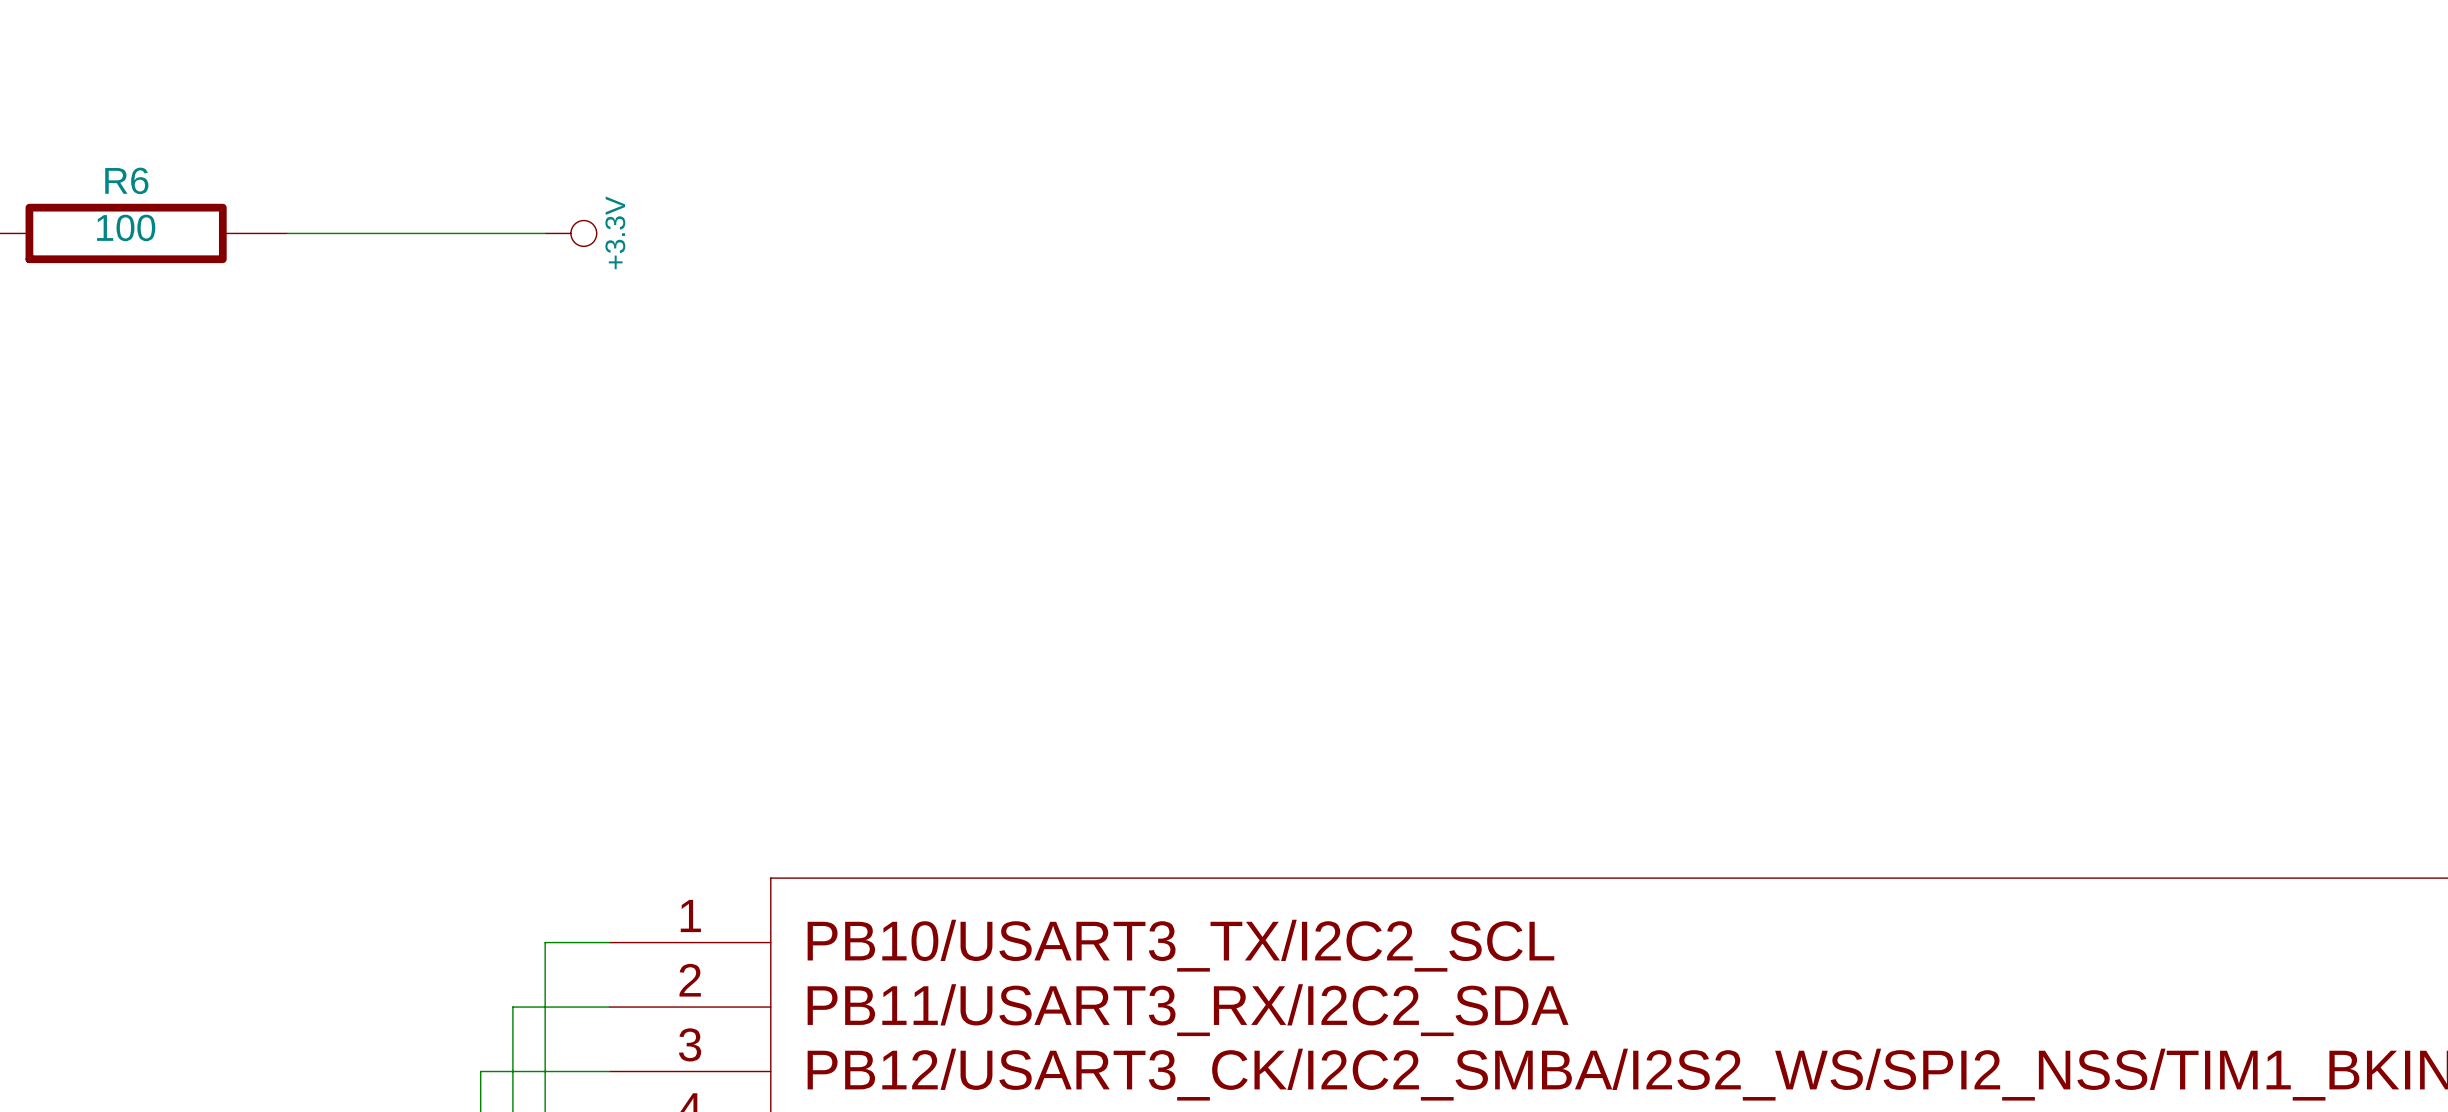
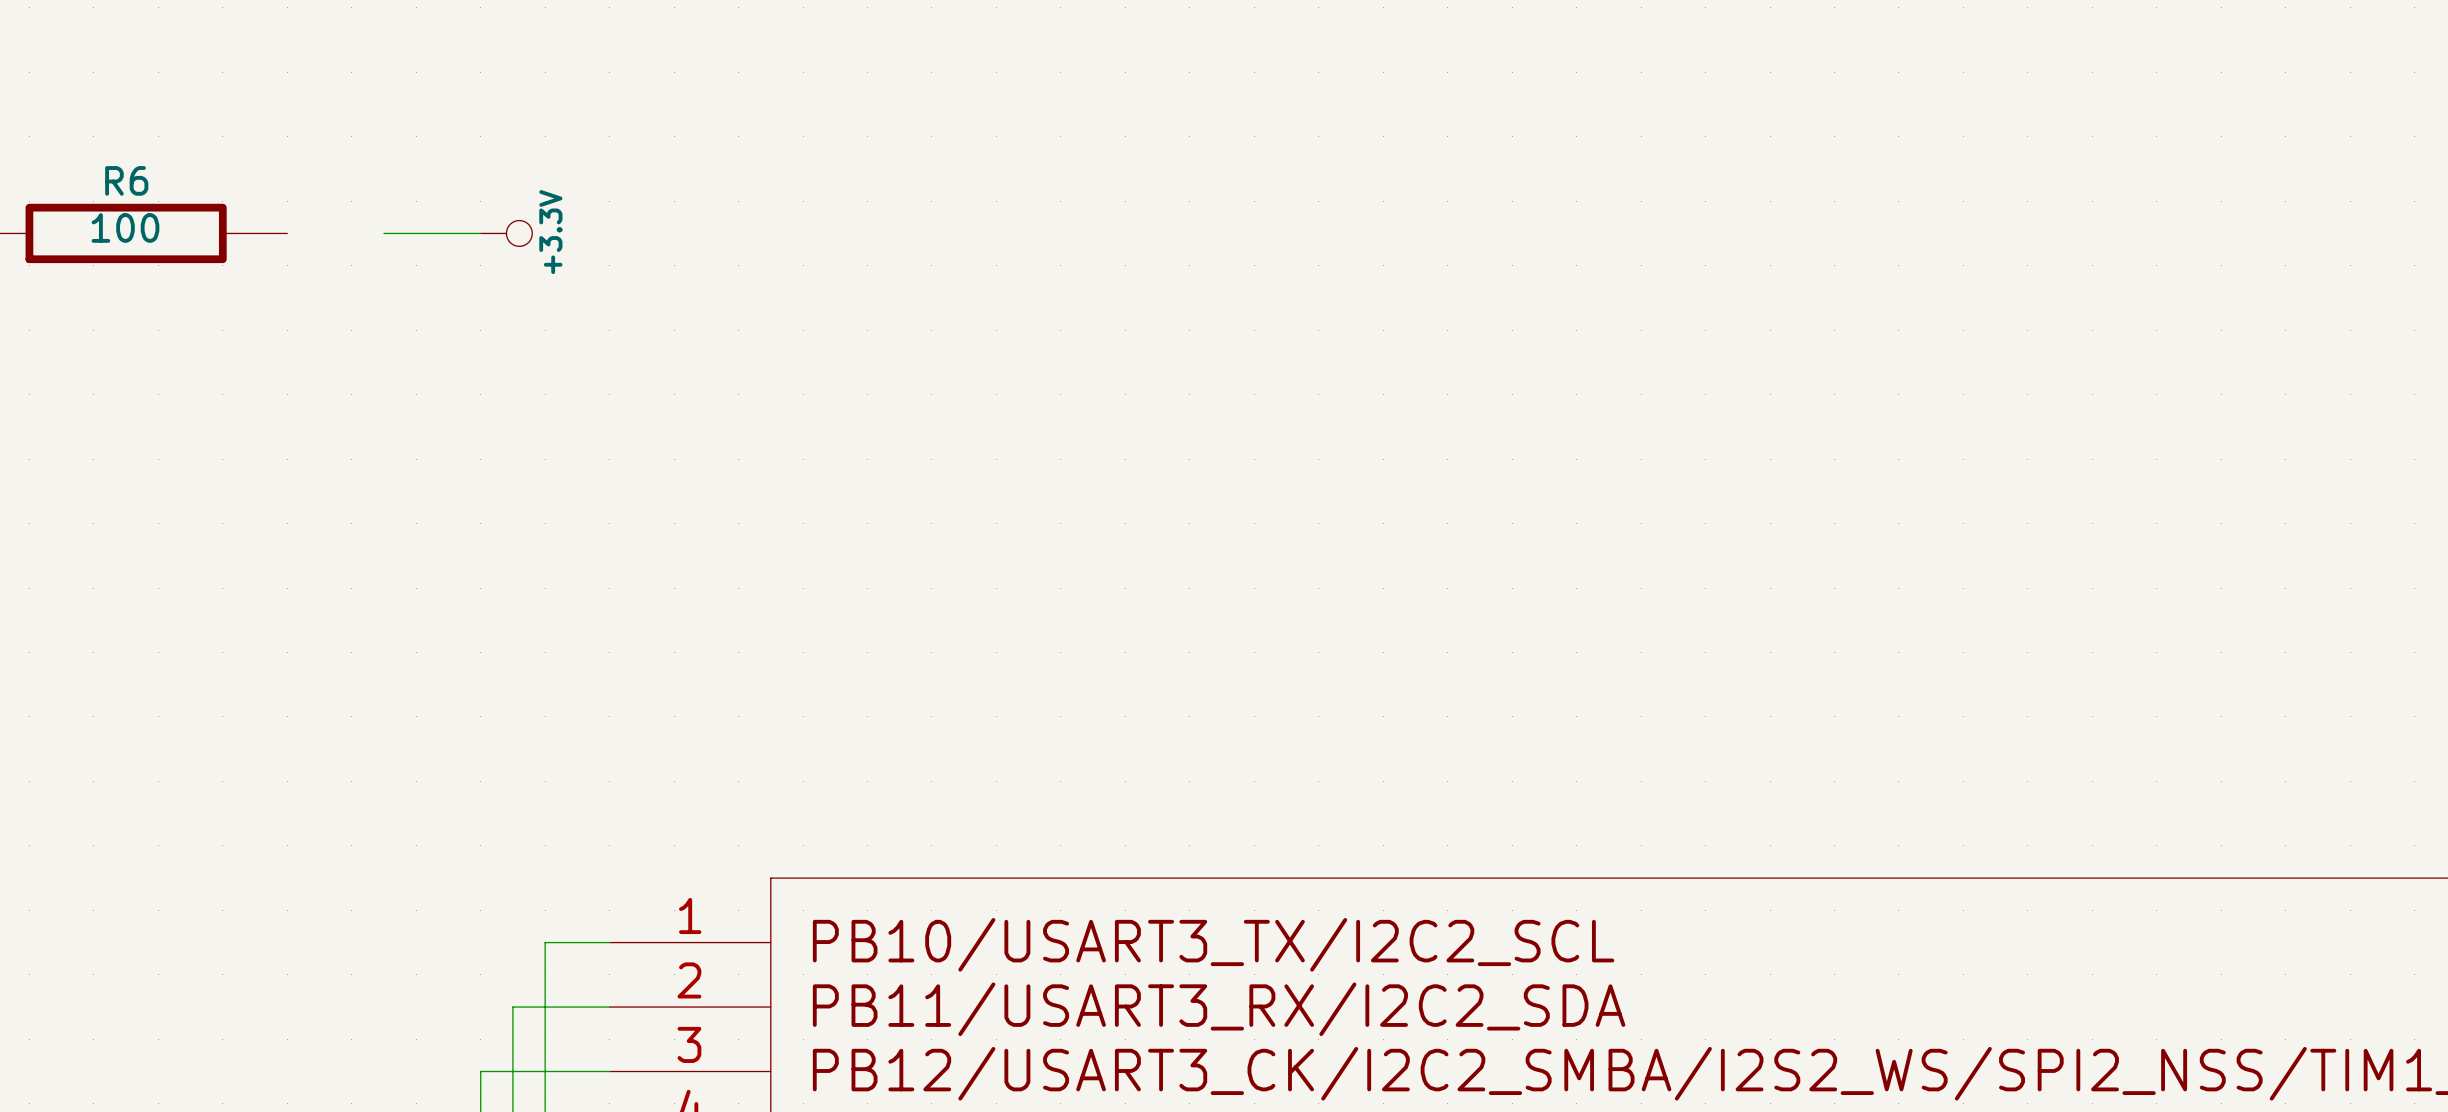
wire: (287, 233) (383, 233) -> none
wire: (480, 233) (545, 233) -> none
power symbol position: +3.3V (570, 233) -> +3.3V (506, 233)

